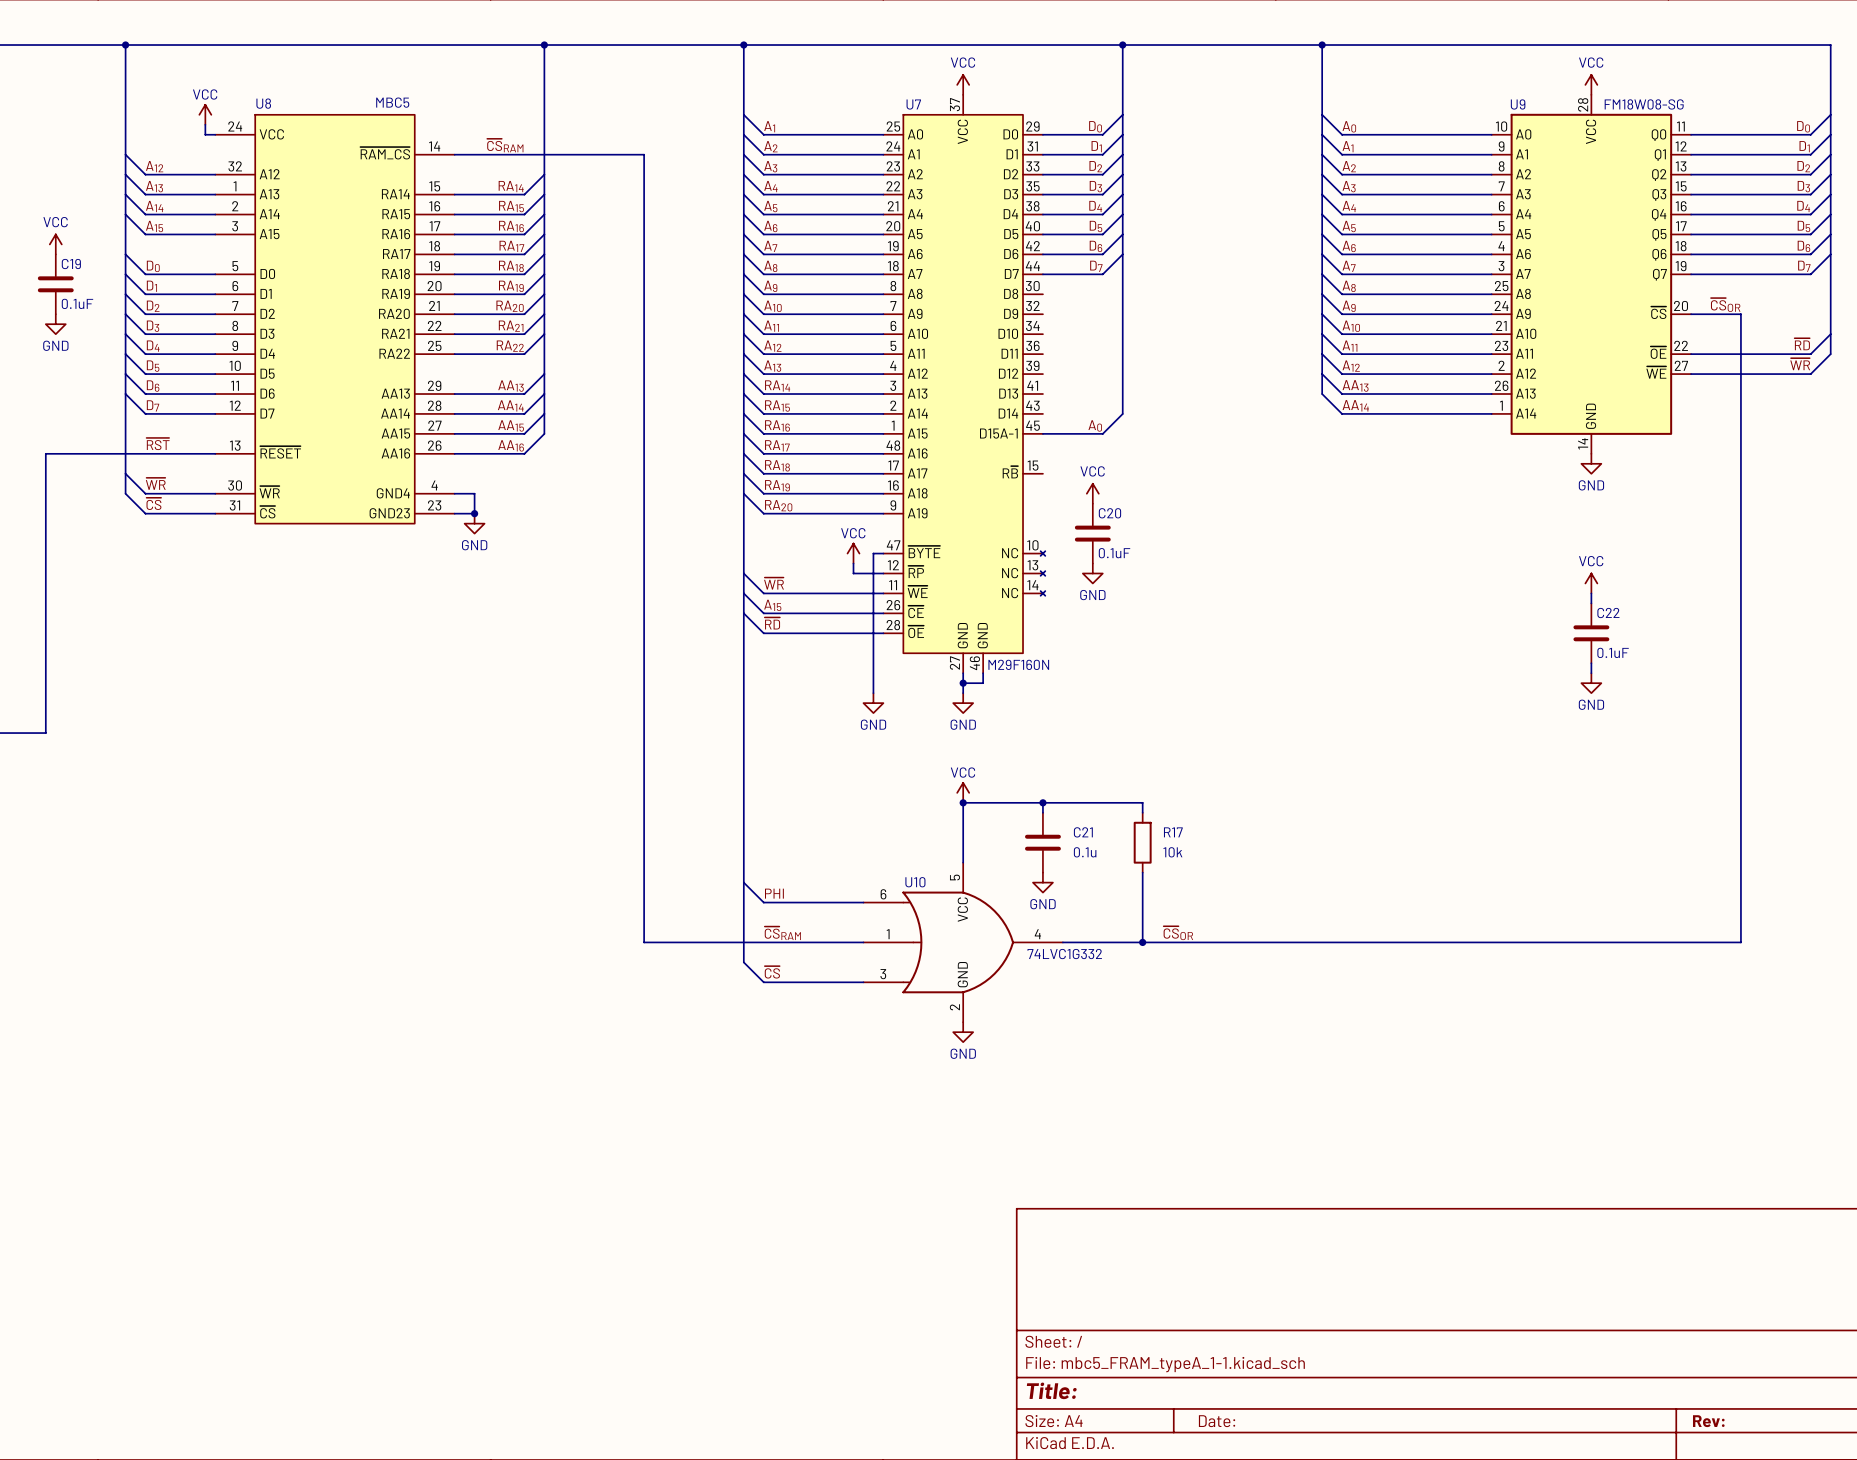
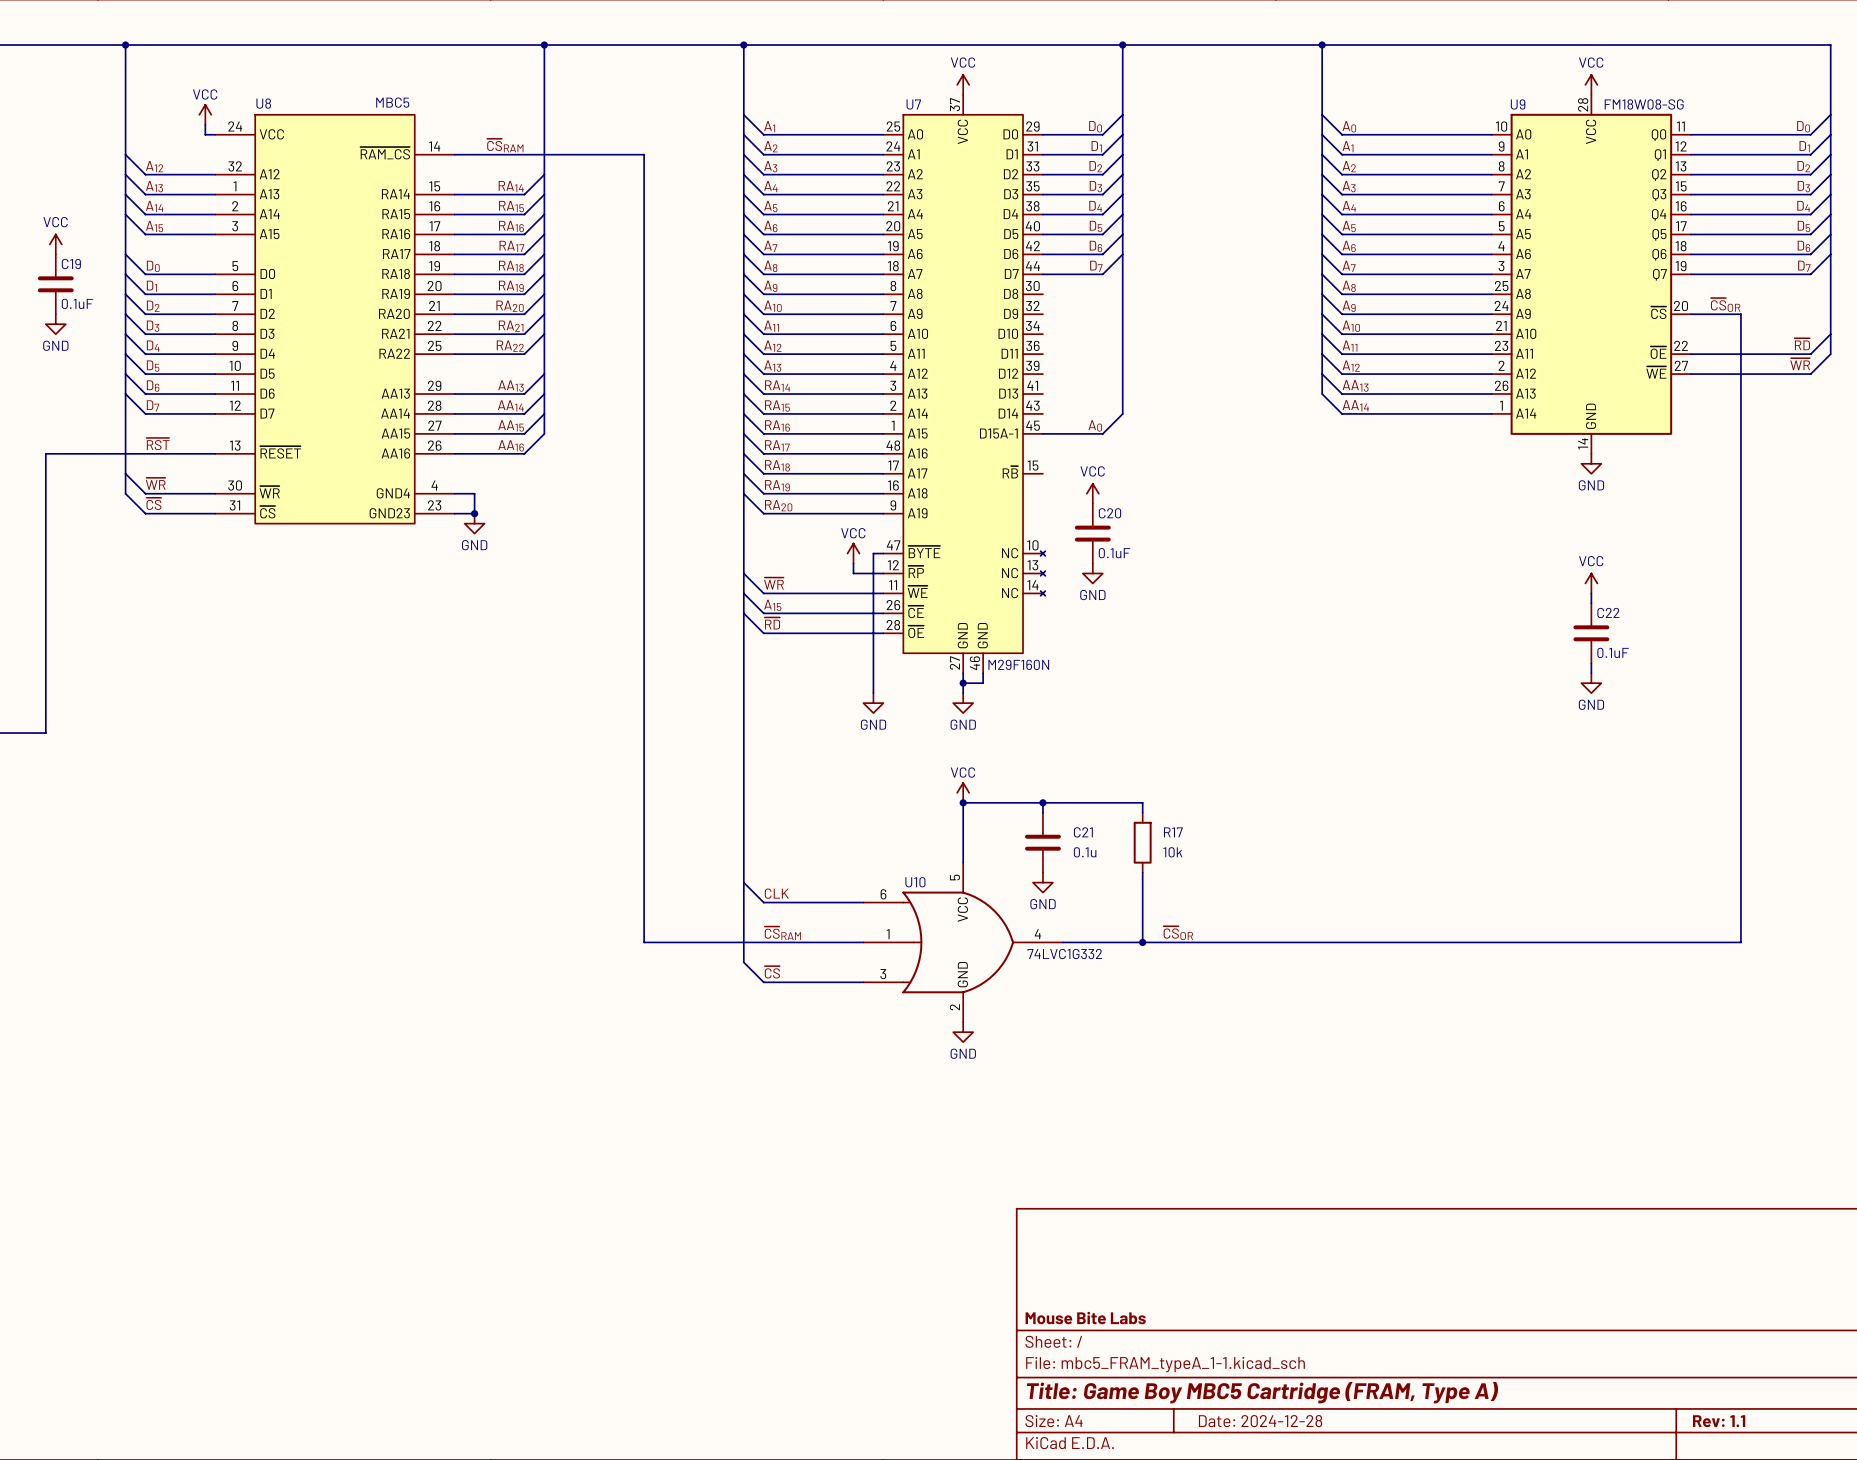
label: PHI (774, 893) -> CLK (776, 893)
title block: none -> Mouse Bite Labs (1085, 1318)
title block: Title: (1051, 1390) -> Title: Game Boy MBC5 Cartridge (FRAM, Type A) (1262, 1392)
title block: Date: (1217, 1421) -> Date: 2024-12-28 (1260, 1421)
title block: Rev: (1708, 1421) -> Rev: 1.1 (1719, 1421)

